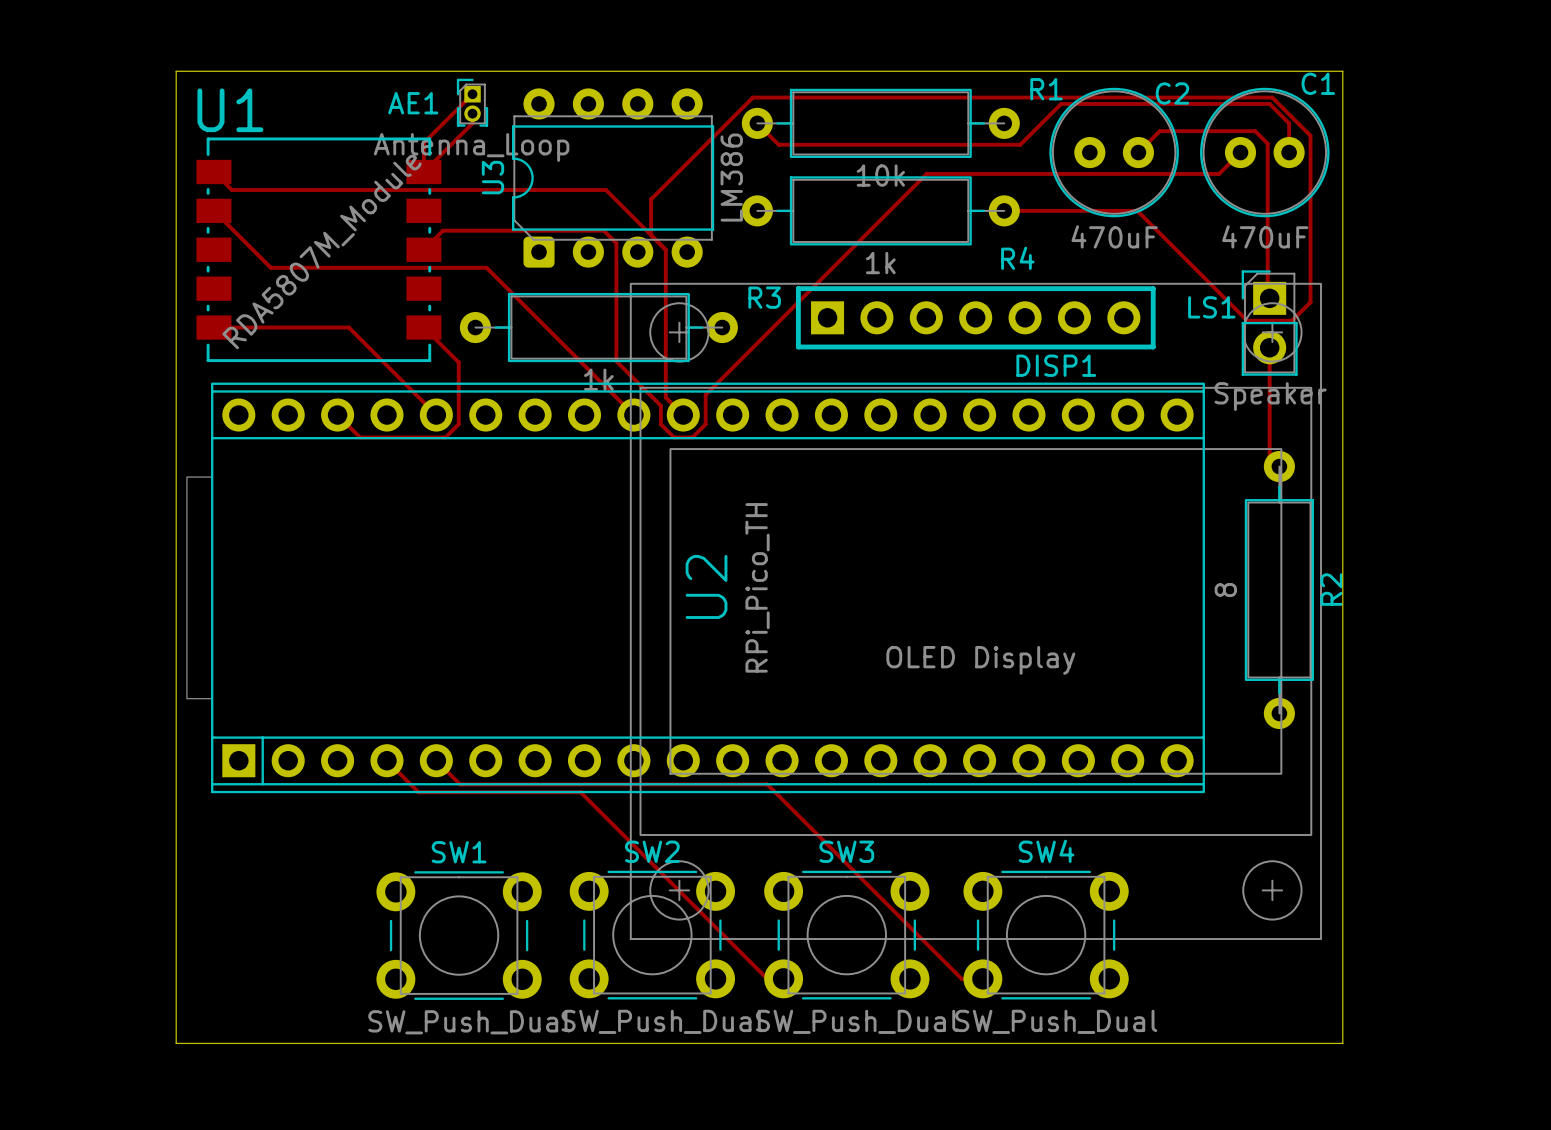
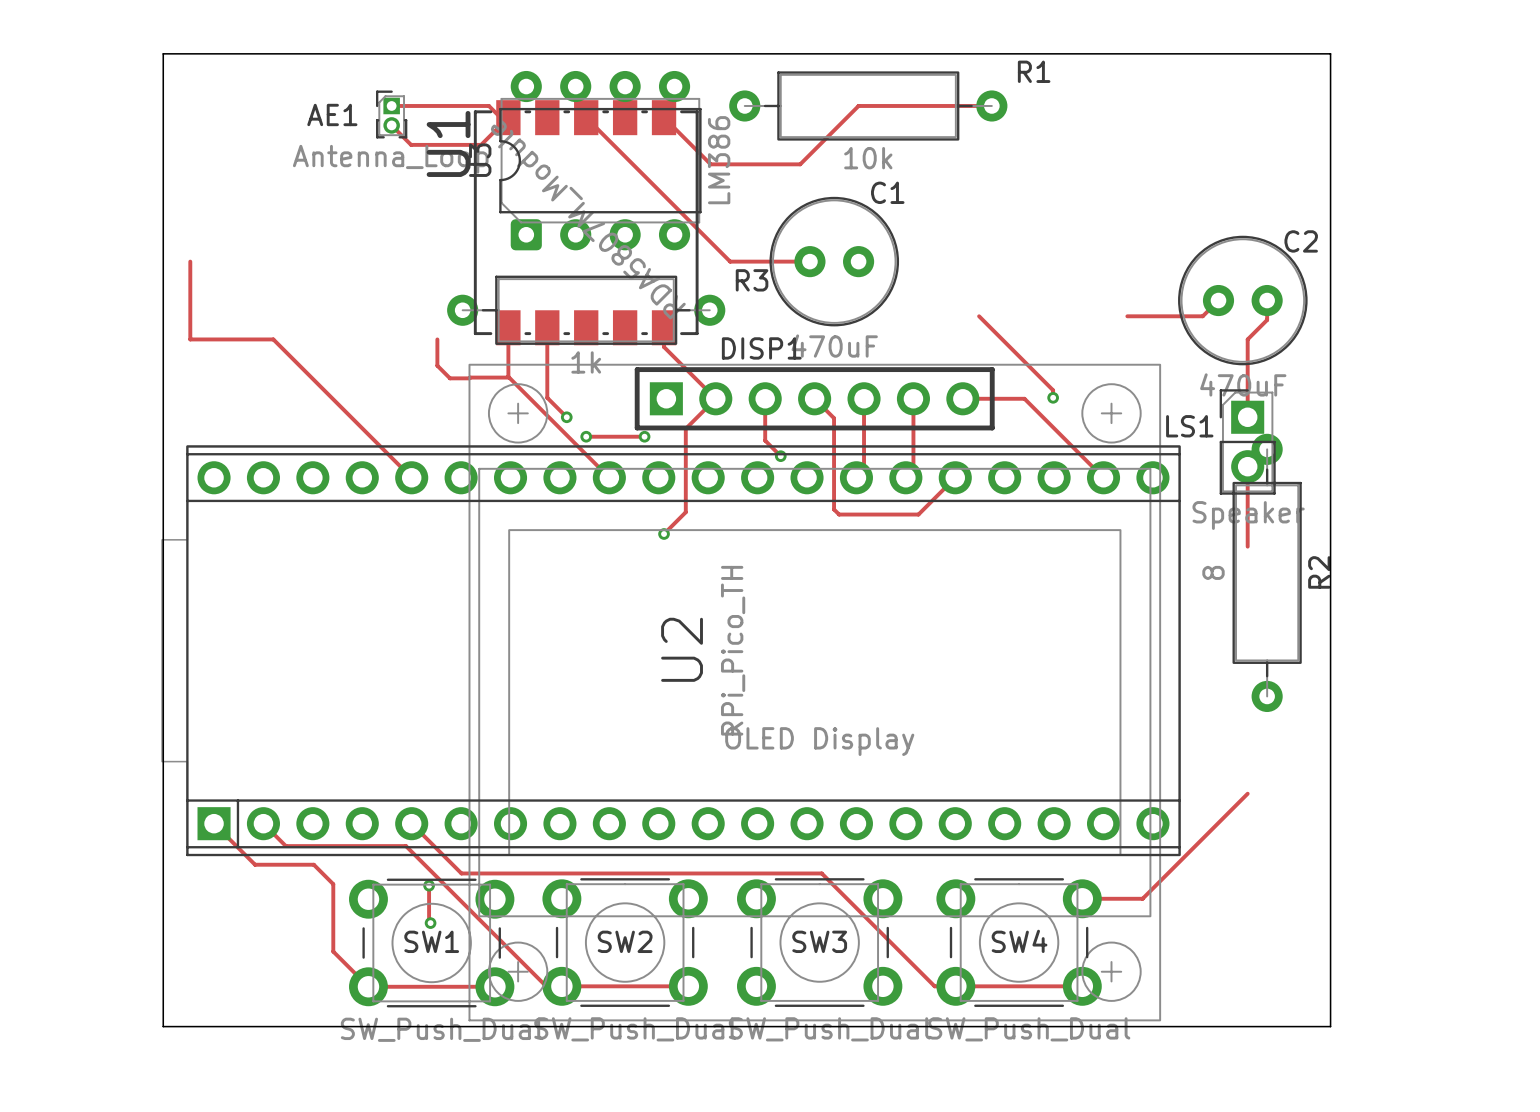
track: (472, 94) (423, 142) (423, 172) (472, 123) (472, 113) -> none
AE1 position: (472, 102) -> (391, 114)
U1 name position: U1 (230, 110) -> U1 (448, 143)
track: none -> (391, 105) (488, 105) (500, 117) (508, 117) (481, 144) (411, 144) (391, 125)
track: none -> (982, 105) (858, 105) (800, 164) (710, 164) (664, 117)
track: (757, 132) (757, 123) (778, 144) (1020, 144) (1061, 103) (1269, 103) (1289, 123) (1289, 152) -> none
track: none -> (586, 117) (730, 261) (809, 261)
C2 position: (1114, 152) -> (1242, 300)
track: (1138, 152) (1159, 131) (1255, 131) (1267, 143) (1267, 296) (1269, 298) -> none
track: (1240, 152) (1219, 173) (926, 173) (705, 394) (705, 424) (692, 437) (674, 437) (660, 424) (660, 405) (616, 361) (616, 243) (603, 230) (442, 230) (423, 249) -> none
C1 position: (1264, 152) -> (834, 261)
track: (213, 172) (231, 190) (605, 190) (665, 249) (665, 397) (683, 415) -> none
track: (213, 210) (270, 267) (486, 267) (633, 415) -> none
R4: 1k (880, 210) -> none
track: (1004, 210) (1137, 210) (1247, 320) (1292, 320) (1310, 302) (1310, 135) (1272, 97) (752, 97) (651, 199) (651, 235) -> none
U1 rotation: 0° (318, 249) -> 90° clockwise (586, 222)
U1 position: (318, 249) -> (586, 222)
track: none -> (190, 261) (190, 339) (273, 339) (411, 477)
track: none -> (1218, 300) (1202, 316) (1127, 316)
track: none -> (1267, 300) (1267, 319) (1247, 339) (1247, 417)
LS1 position: (1269, 323) -> (1247, 441)
track: (213, 327) (348, 327) (436, 415) -> none
track: (423, 327) (458, 362) (458, 424) (445, 437) (359, 437) (337, 415) -> none
track: none -> (979, 316) (1053, 390) (1053, 397)
track: none -> (508, 327) (508, 376) (609, 477)
track: none -> (547, 327) (547, 397) (566, 417)
track: none -> (664, 327) (664, 347) (715, 398) (685, 428) (685, 512) (664, 533)
track: (1269, 347) (1269, 456) (1279, 466) -> none
track: none -> (437, 339) (437, 365) (450, 378) (509, 377)
DISP1 name position: DISP1 (1056, 365) -> DISP1 (761, 348)
via: none -> (1053, 397)
track: none -> (765, 398) (765, 440) (780, 456)
track: none -> (814, 398) (834, 418) (834, 509) (839, 514) (918, 514) (955, 477)
track: none -> (864, 398) (864, 470) (856, 477)
track: none -> (913, 398) (913, 470) (905, 477)
track: none -> (962, 398) (1024, 398) (1103, 477)
via: none -> (566, 417)
track: none -> (586, 436) (644, 436)
via: none -> (586, 436)
via: none -> (644, 436)
via: none -> (780, 456)
track: none -> (1247, 466) (1247, 546)
via: none -> (664, 533)
U2 position: (695, 587) -> (671, 650)
DISP1 position: (975, 611) -> (814, 692)
track: (386, 760) (418, 792) (580, 792) (767, 978) (783, 978) -> none
track: (436, 760) (460, 784) (767, 784) (961, 978) (982, 978) -> none
track: none -> (1247, 793) (1142, 898) (1082, 898)
track: none -> (214, 823) (255, 864) (313, 864) (333, 884) (333, 951) (368, 986) (494, 986)
track: none -> (263, 823) (285, 846) (405, 846) (546, 986) (688, 986)
track: none -> (411, 823) (461, 873) (821, 873) (934, 986) (1082, 986)
SW2 name position: SW2 (652, 851) -> SW2 (625, 941)
SW3 name position: SW3 (846, 851) -> SW3 (819, 941)
SW4 name position: SW4 (1046, 851) -> SW4 (1019, 941)
SW1 name position: SW1 (459, 852) -> SW1 (431, 941)
track: none -> (429, 885) (430, 923)
via: none -> (429, 885)
SW1 position: (459, 935) -> (431, 943)
SW2 position: (652, 935) -> (625, 942)
SW3 position: (846, 935) -> (819, 942)
SW4 position: (1046, 935) -> (1019, 942)
via: none -> (430, 923)

